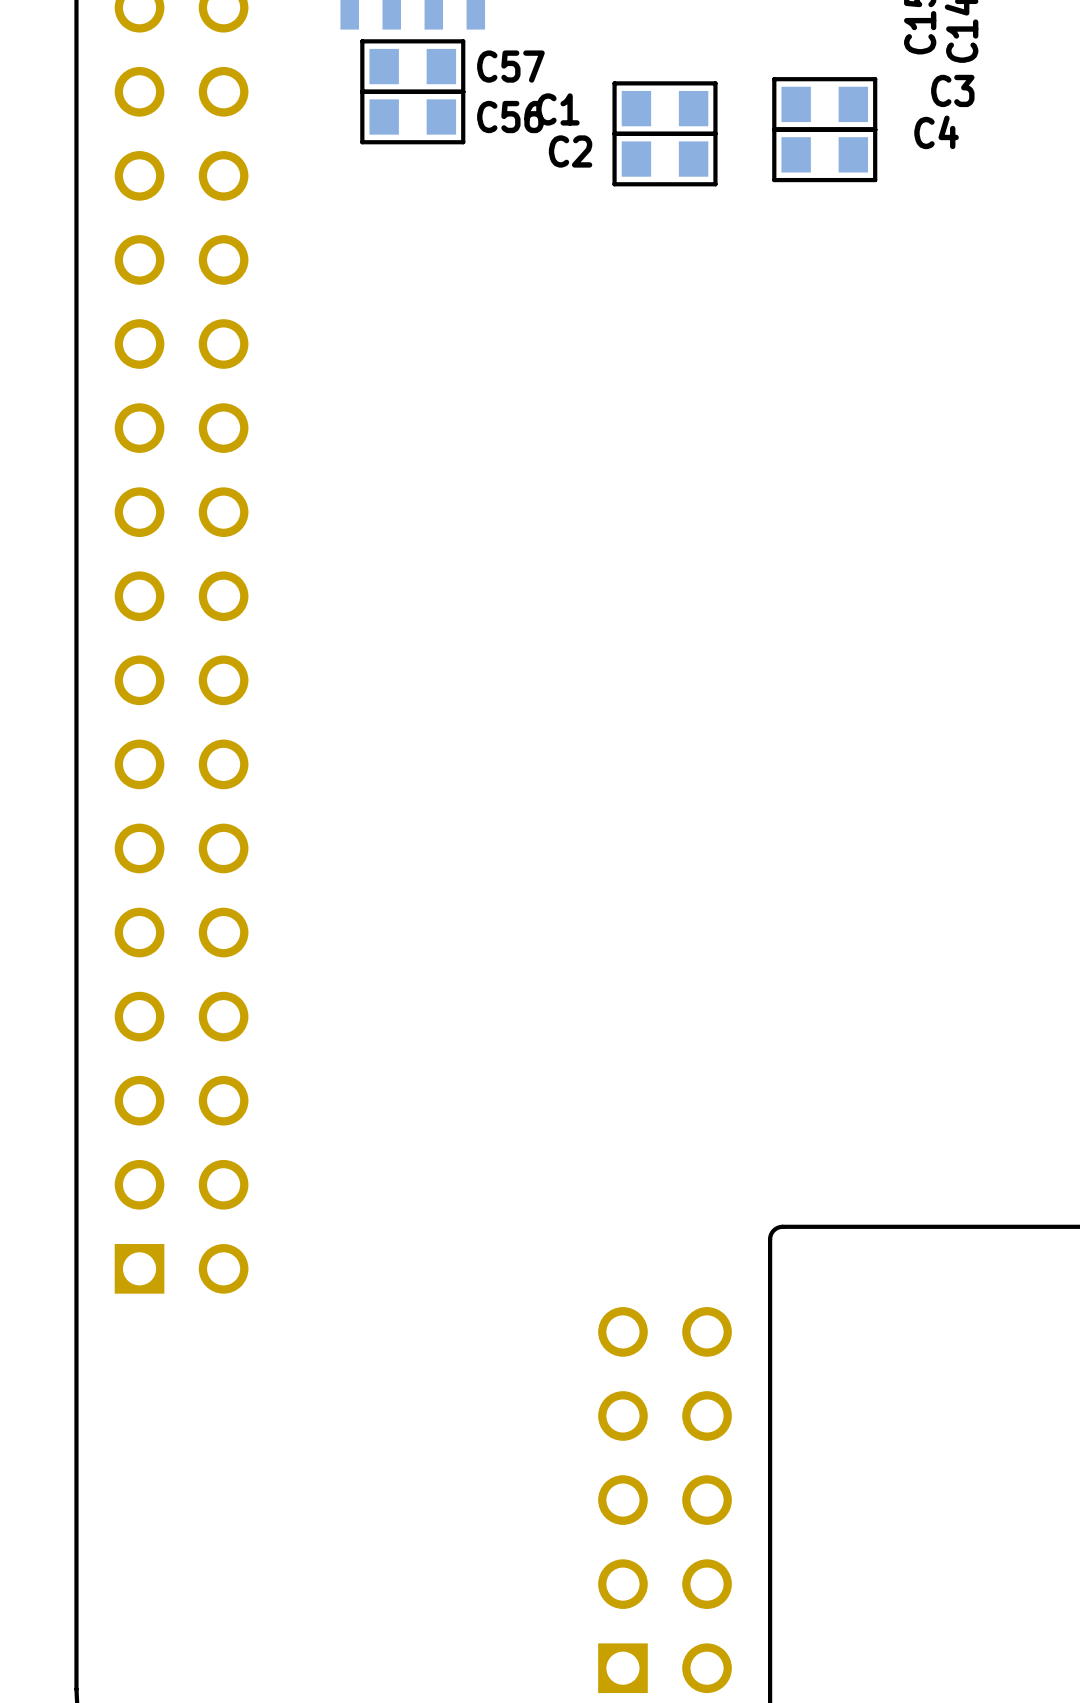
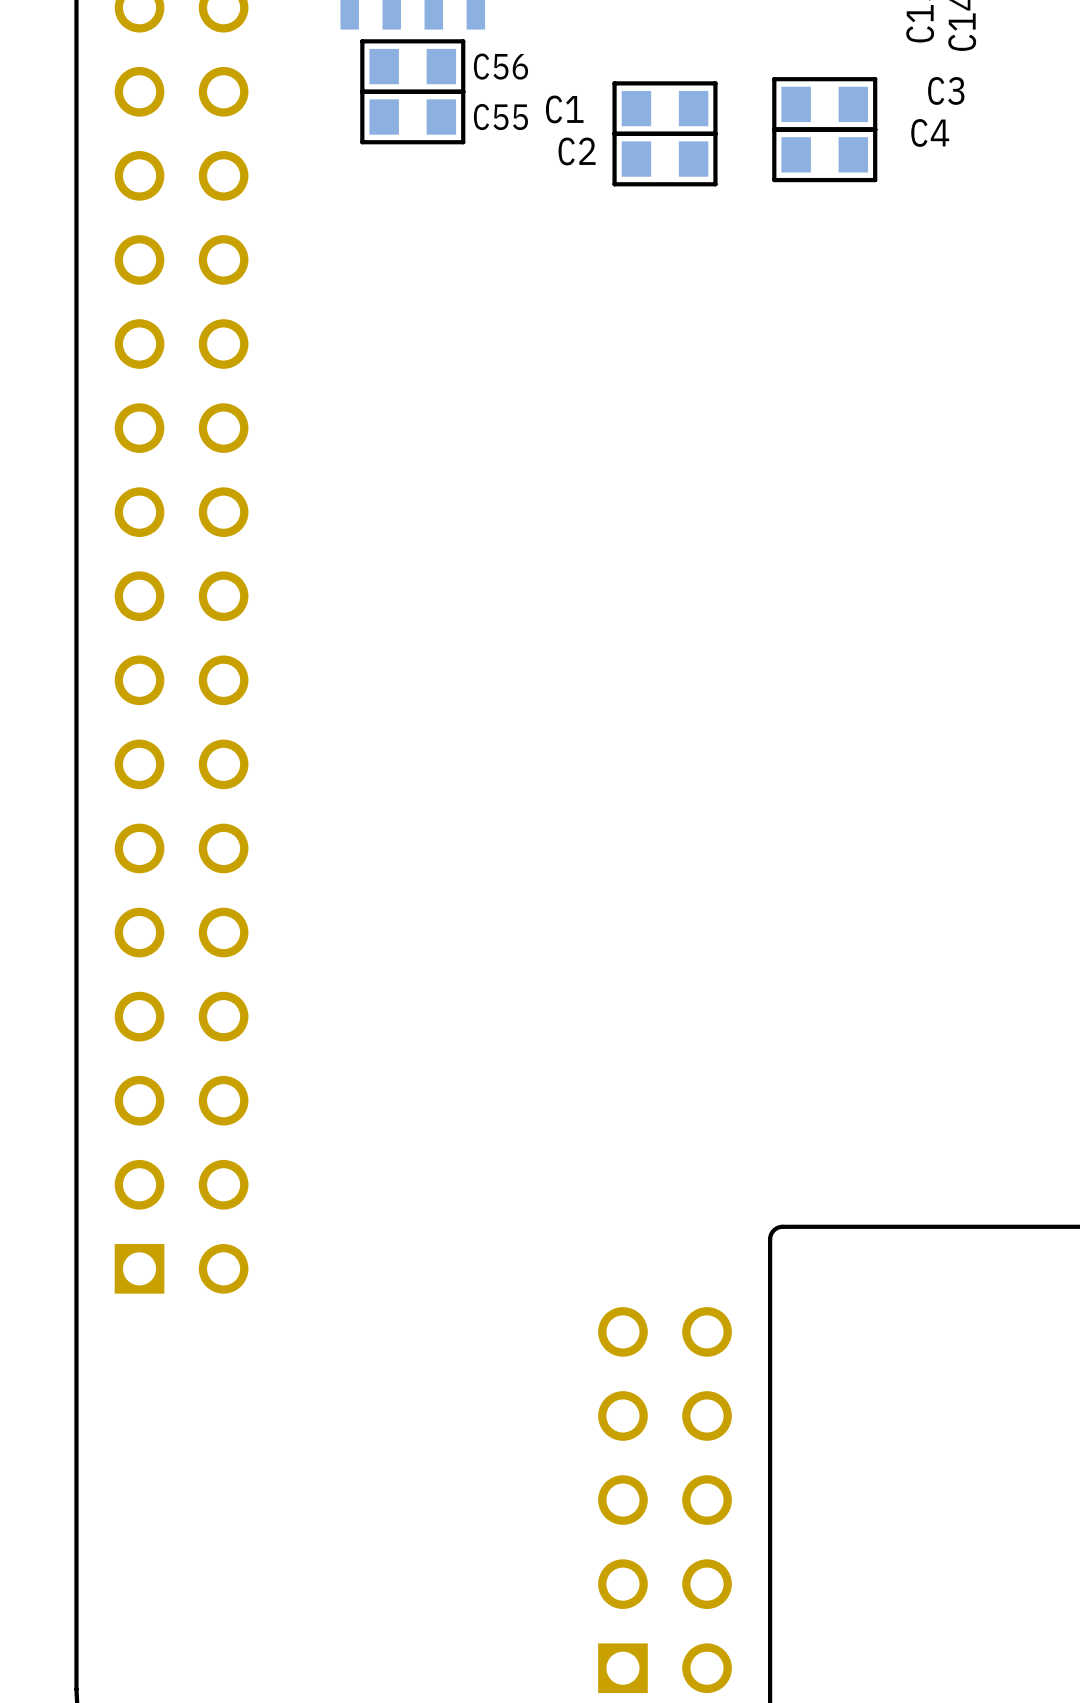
C57 name: C57 (510, 66) -> C56 (500, 66)
C56 name: C56 (510, 117) -> C55 (500, 117)

